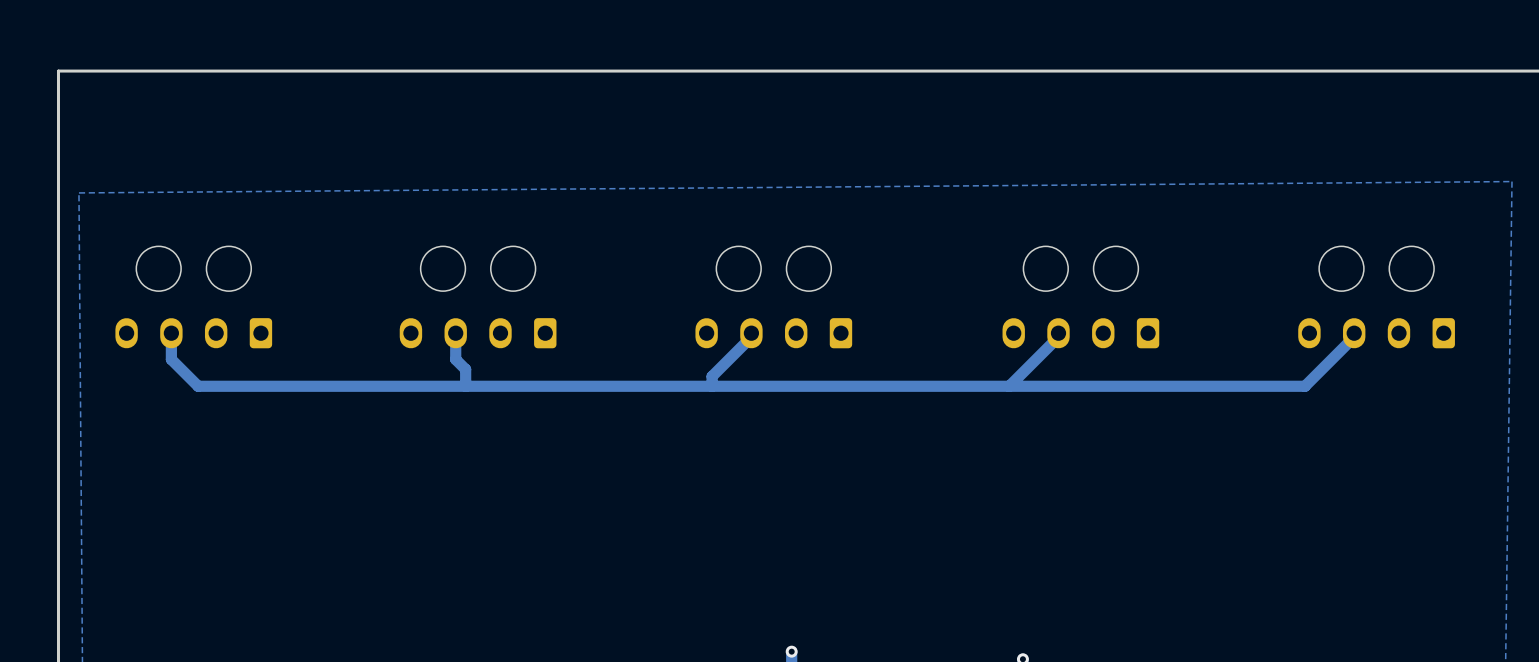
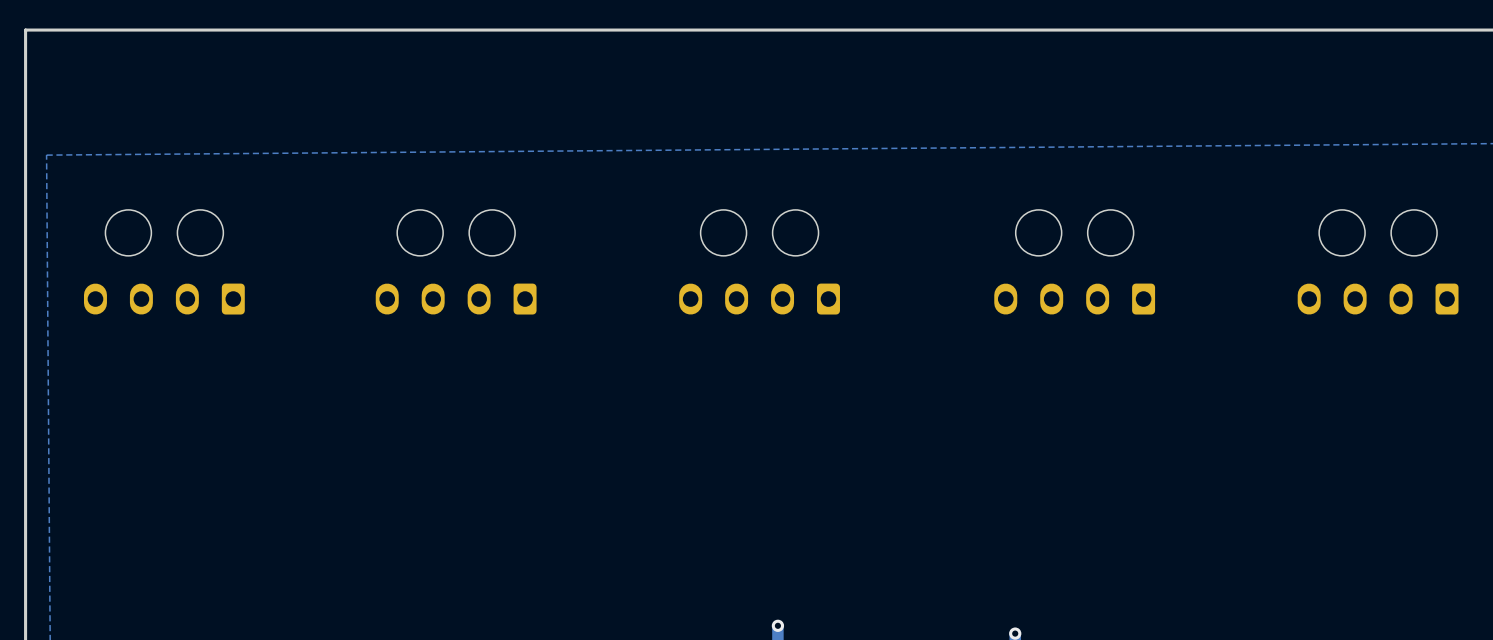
track: (455, 333) (455, 359) (465, 369) (465, 386) -> none
track: (751, 333) (751, 337) (712, 376) (712, 386) -> none
track: (1058, 333) (1058, 337) (1009, 386) -> none
track: (1354, 333) (1354, 337) (1305, 386) (198, 386) (171, 359) (171, 333) -> none

